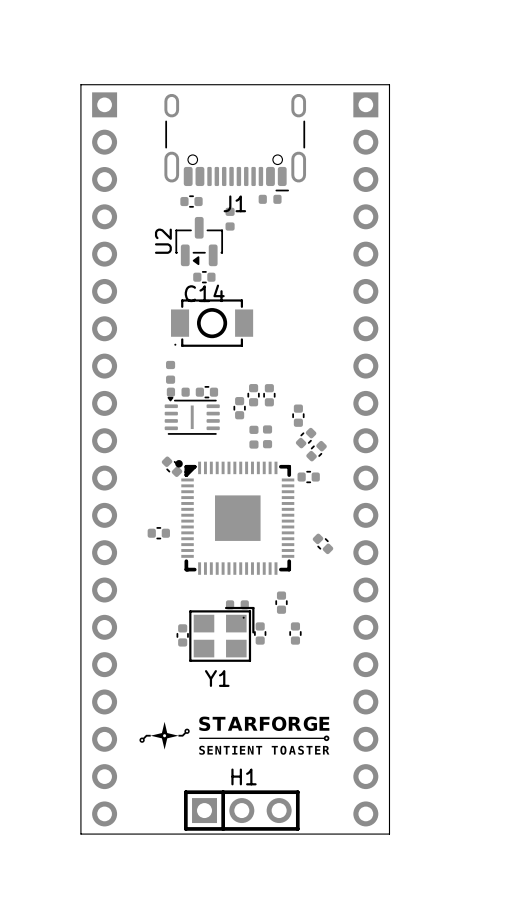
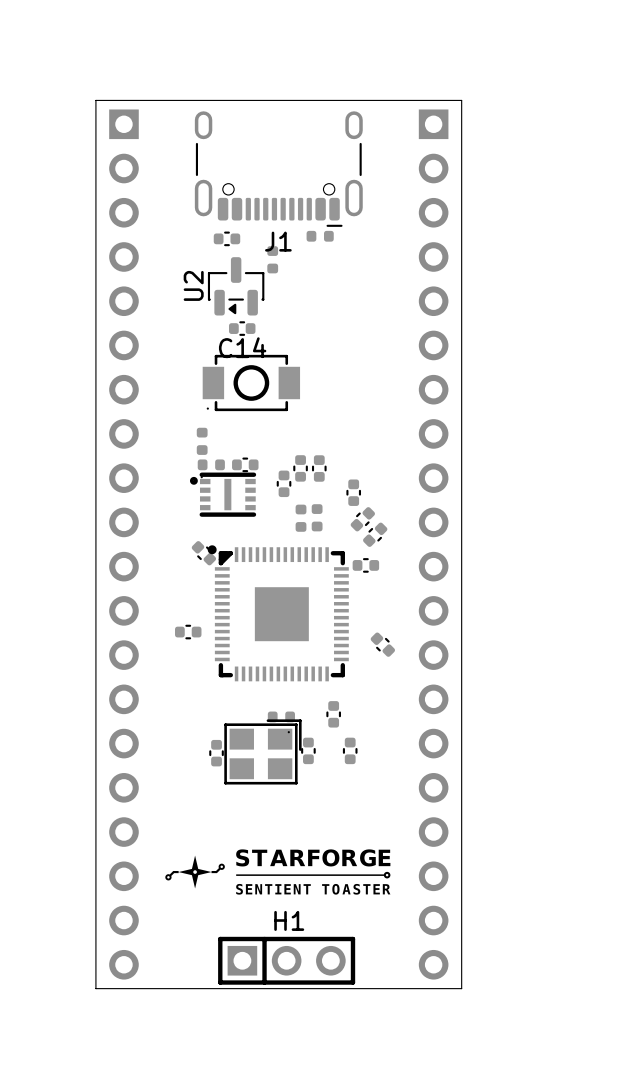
part footprint: [164, 396, 220, 435] -> [189, 472, 257, 517]
Y1 name: Y1 (217, 678) -> none

